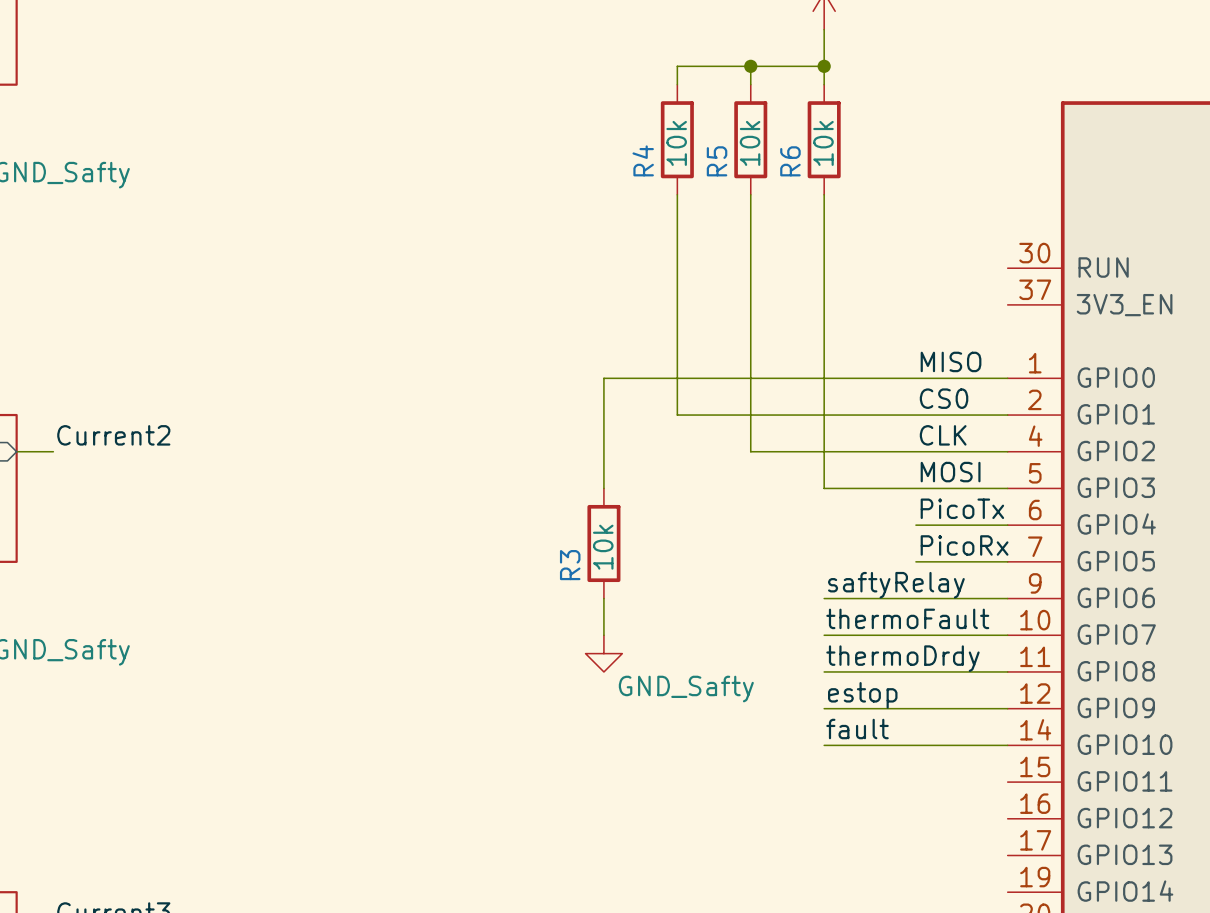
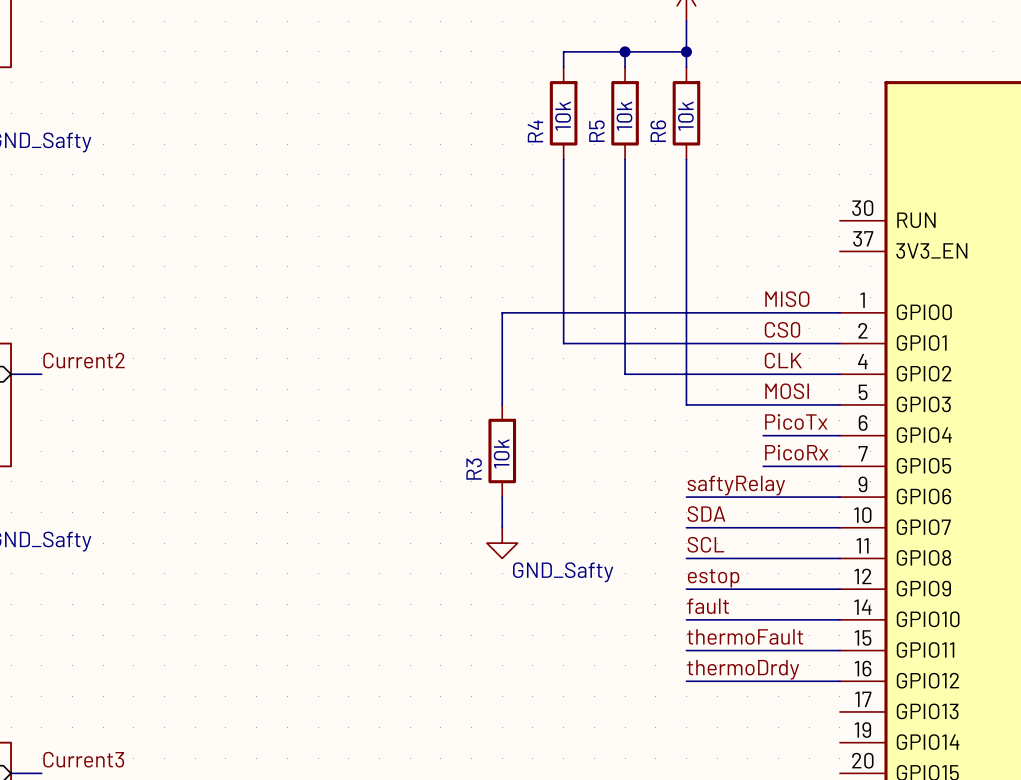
label: thermoFault (907, 618) -> SDA (706, 514)
label: thermoDrdy (902, 658) -> SCL (705, 544)
label: none -> thermoFault (745, 636)
wire: none -> (686, 650) (839, 650)
label: none -> thermoDrdy (743, 669)
wire: none -> (686, 681) (839, 681)

